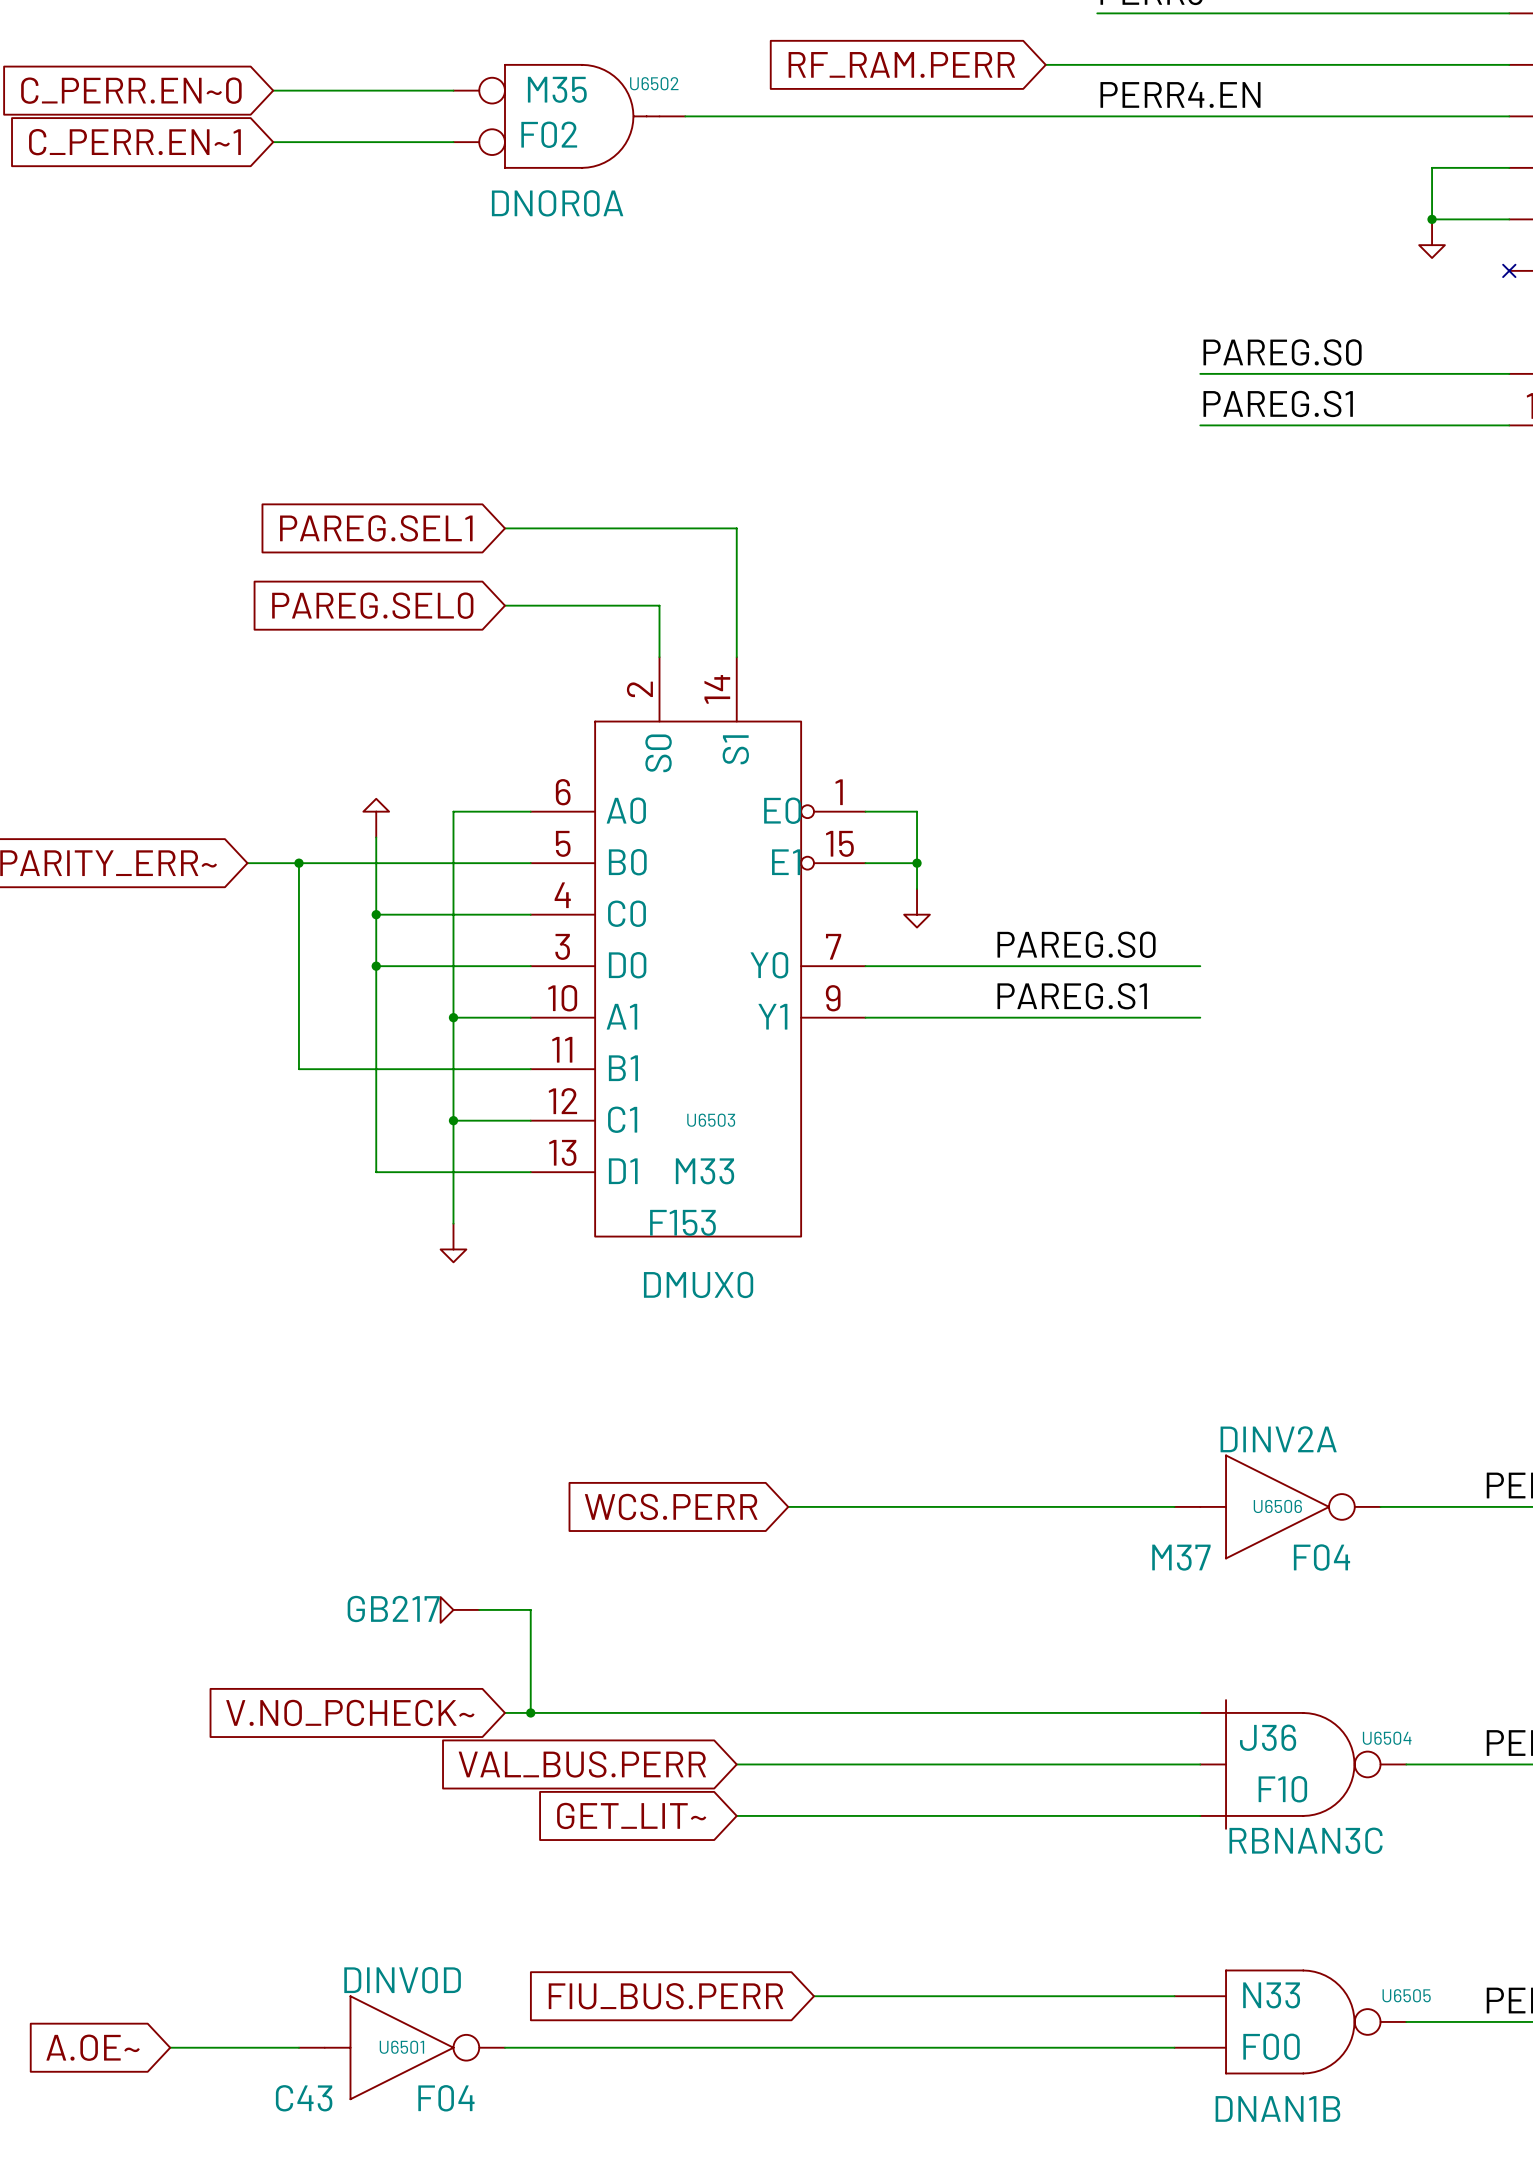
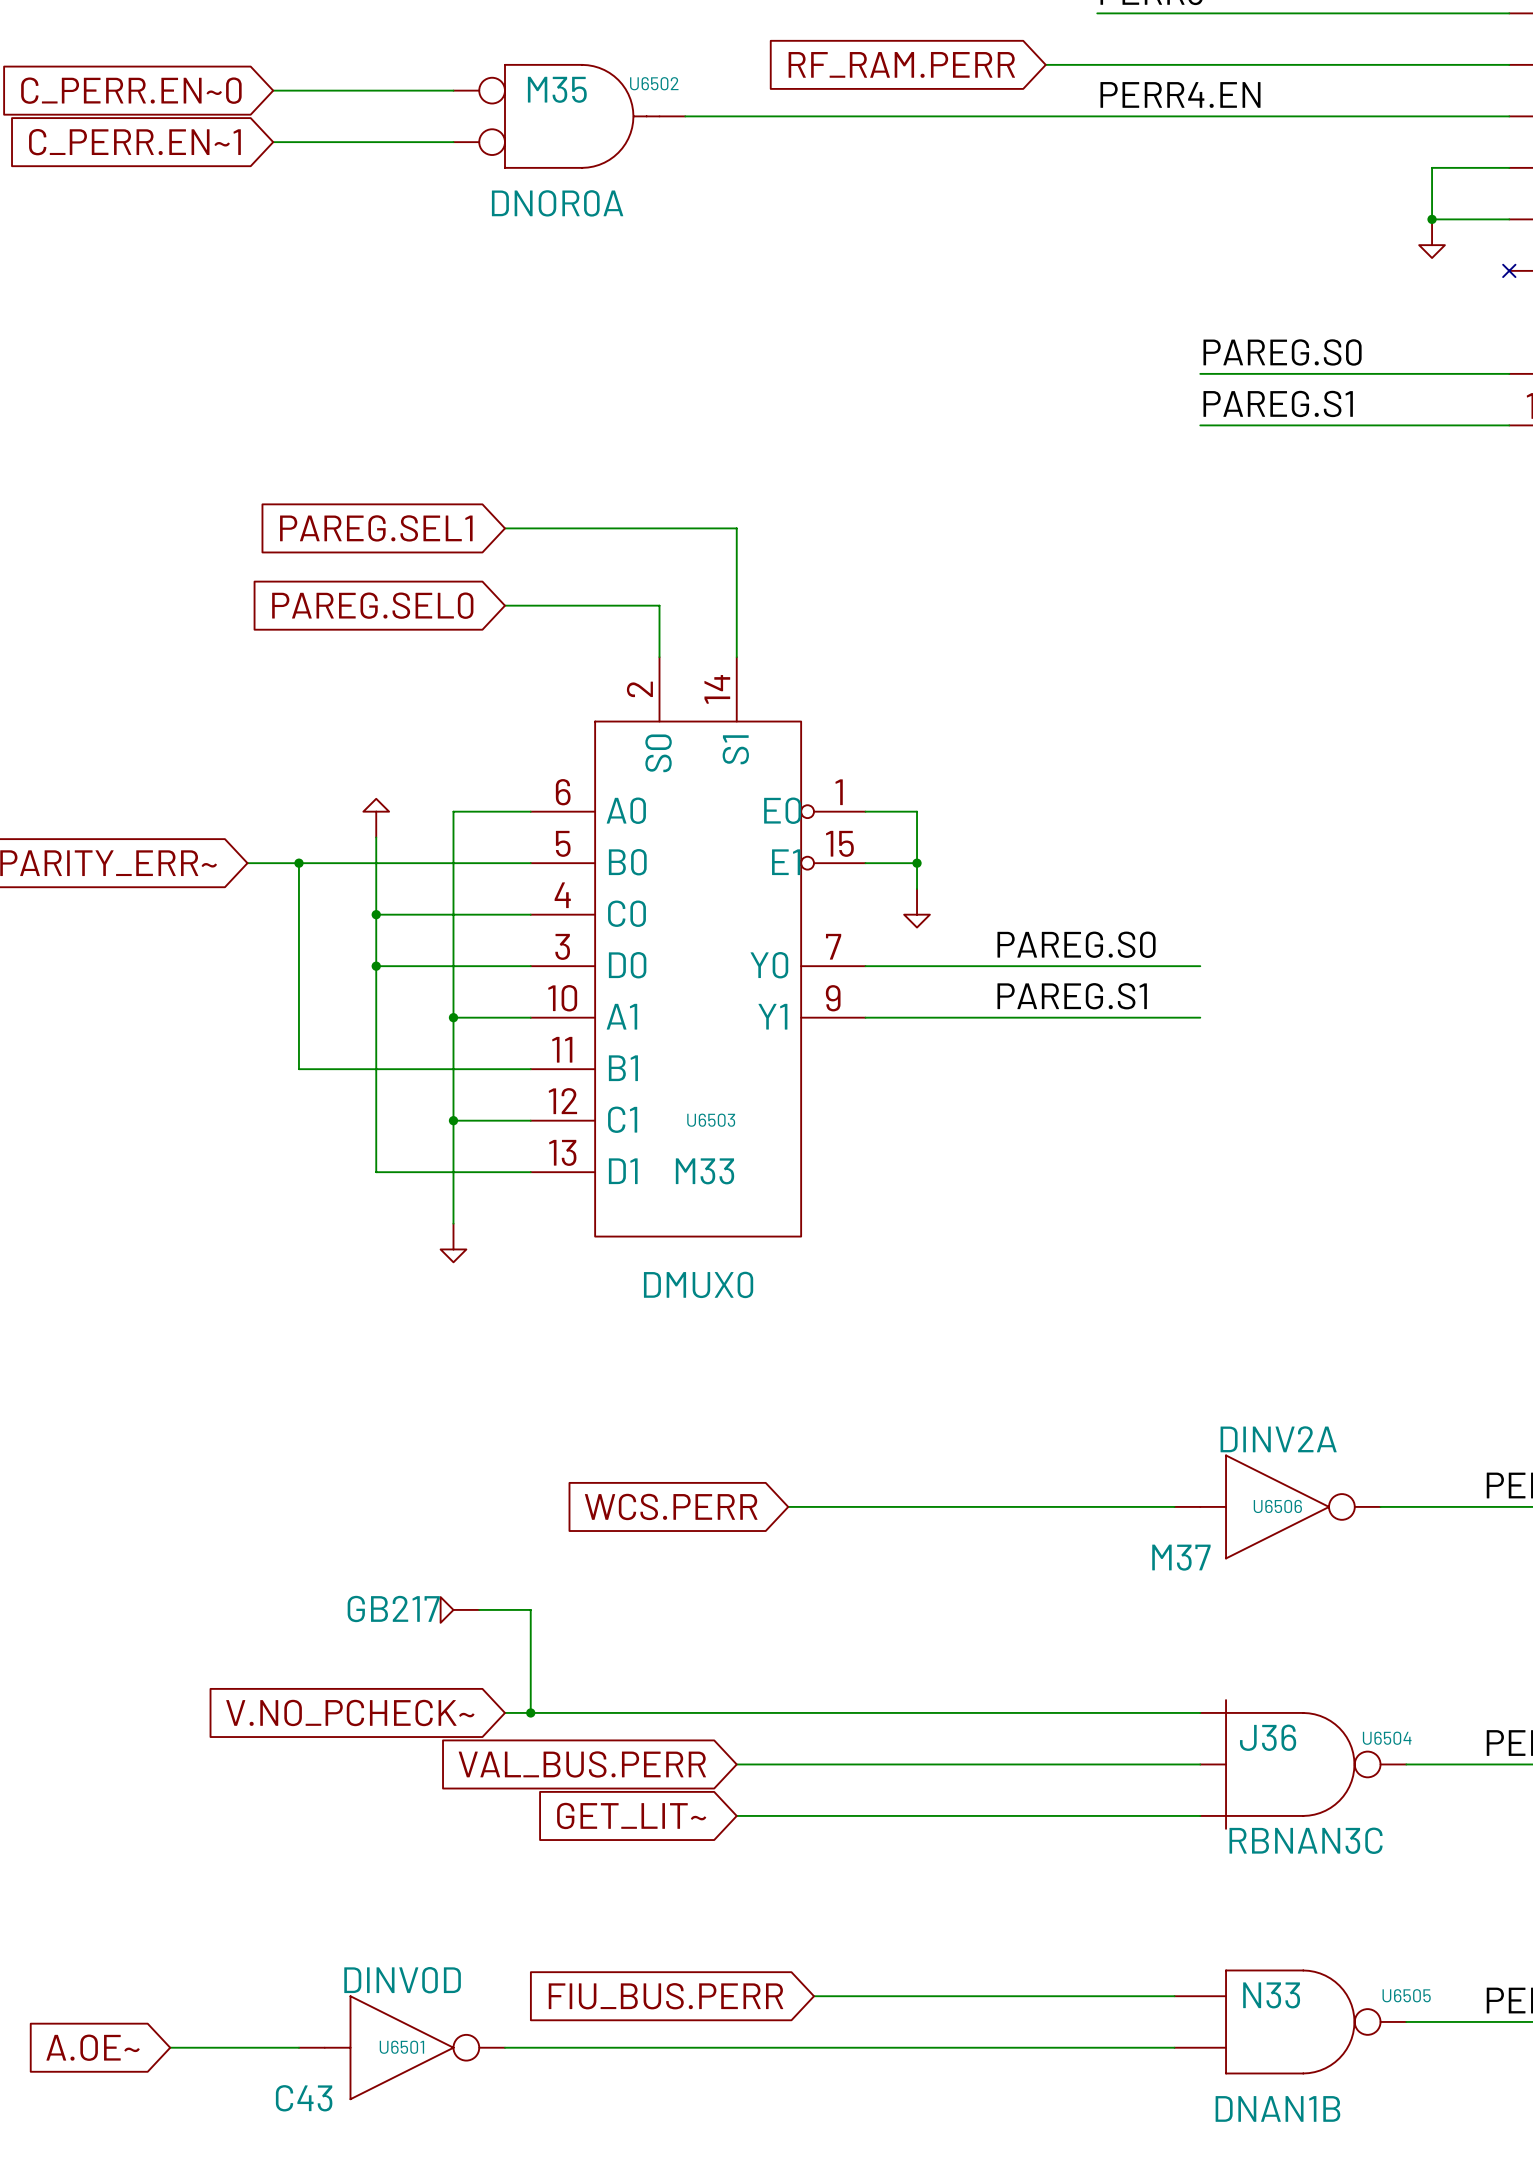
U6502 value: F02 (549, 134) -> none
U6503 value: F153 (682, 1222) -> none
U6506 value: F04 (1321, 1557) -> none
U6504 value: F10 (1282, 1789) -> none
U6505 value: F00 (1271, 2046) -> none
U6501 value: F04 (446, 2098) -> none

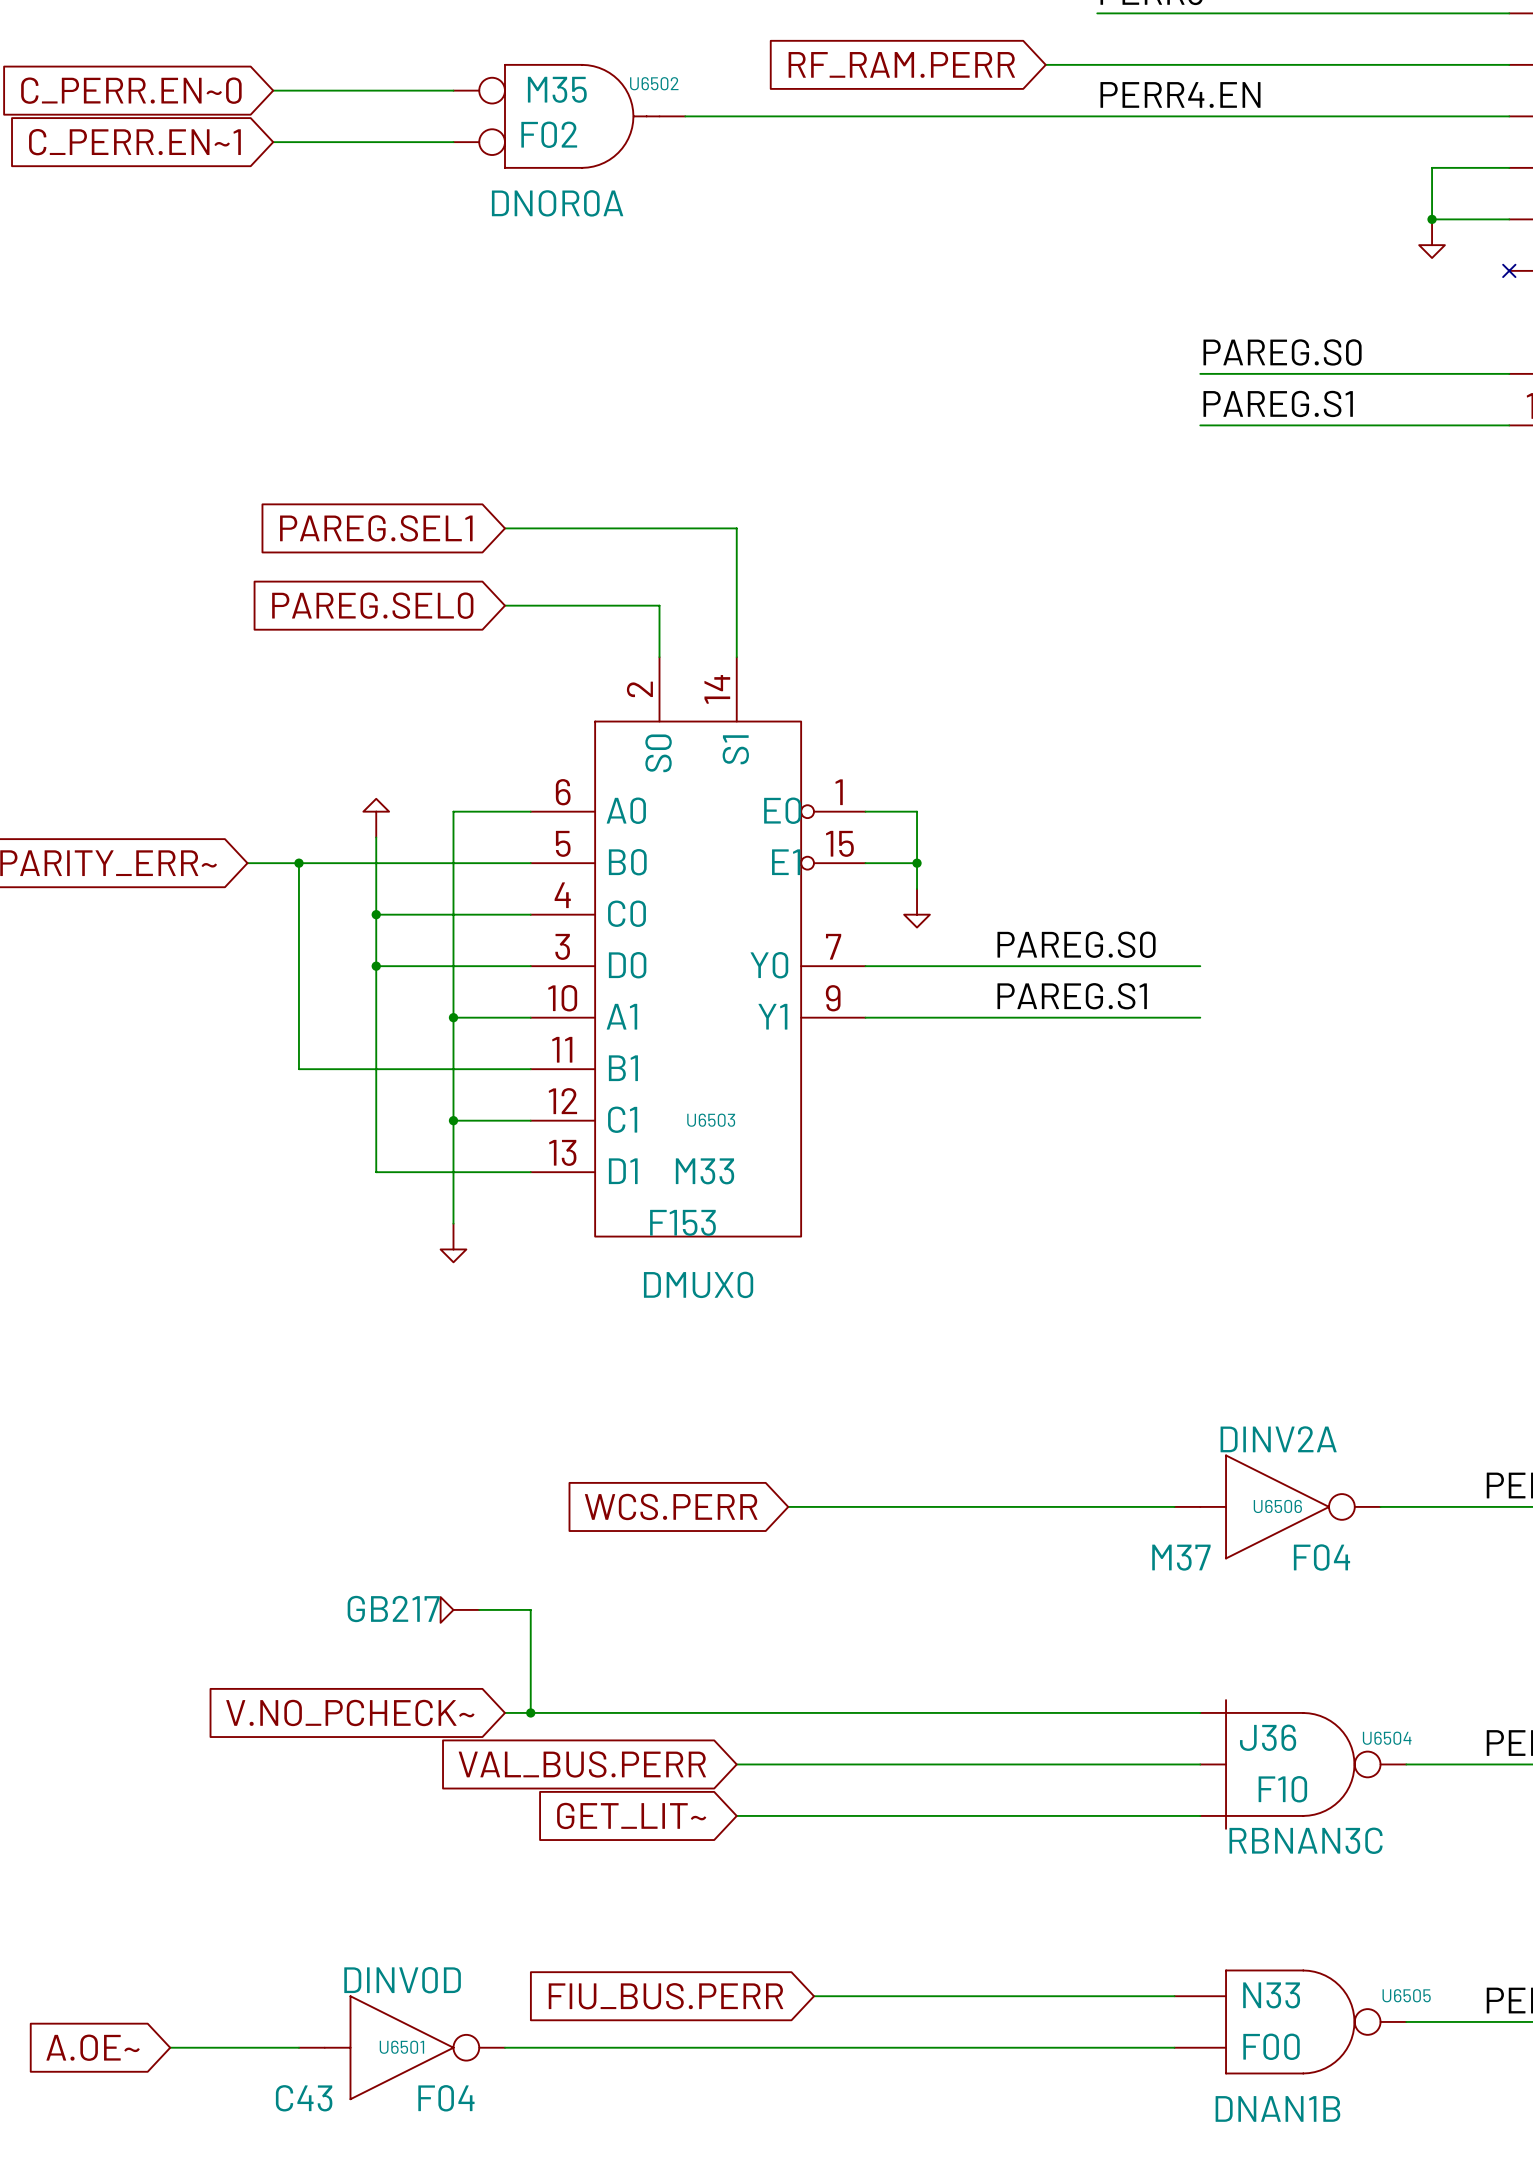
U6502 value: none -> F02 (549, 134)
U6503 value: none -> F153 (682, 1222)
U6506 value: none -> F04 (1321, 1557)
U6504 value: none -> F10 (1282, 1789)
U6505 value: none -> F00 (1271, 2046)
U6501 value: none -> F04 (446, 2098)

